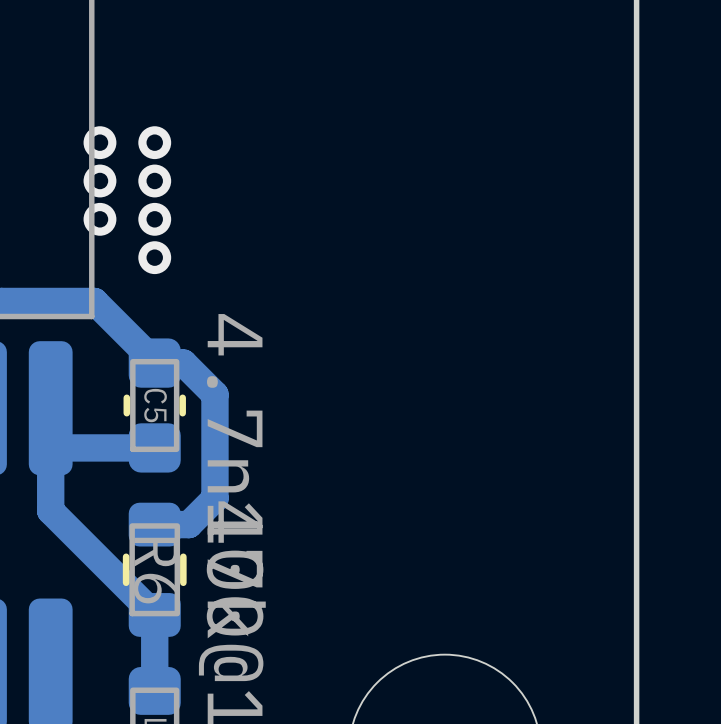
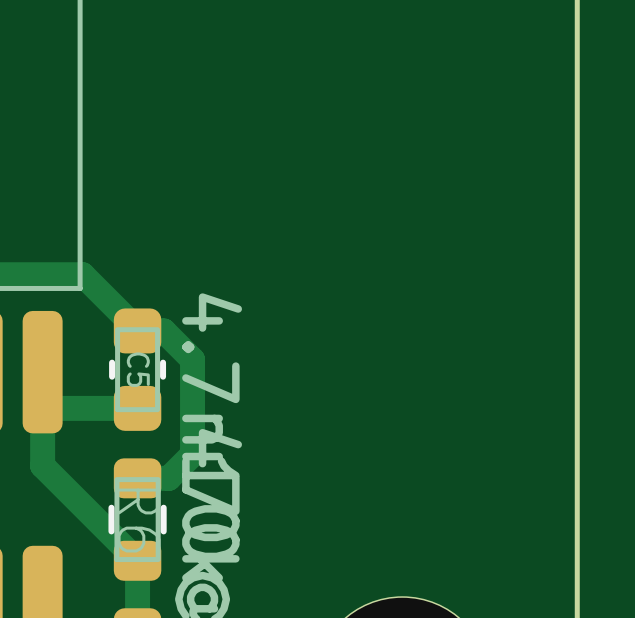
via: (99, 142) -> none
via: (154, 142) -> none
via: (99, 181) -> none
via: (154, 181) -> none
via: (99, 219) -> none
via: (154, 219) -> none
via: (154, 257) -> none

